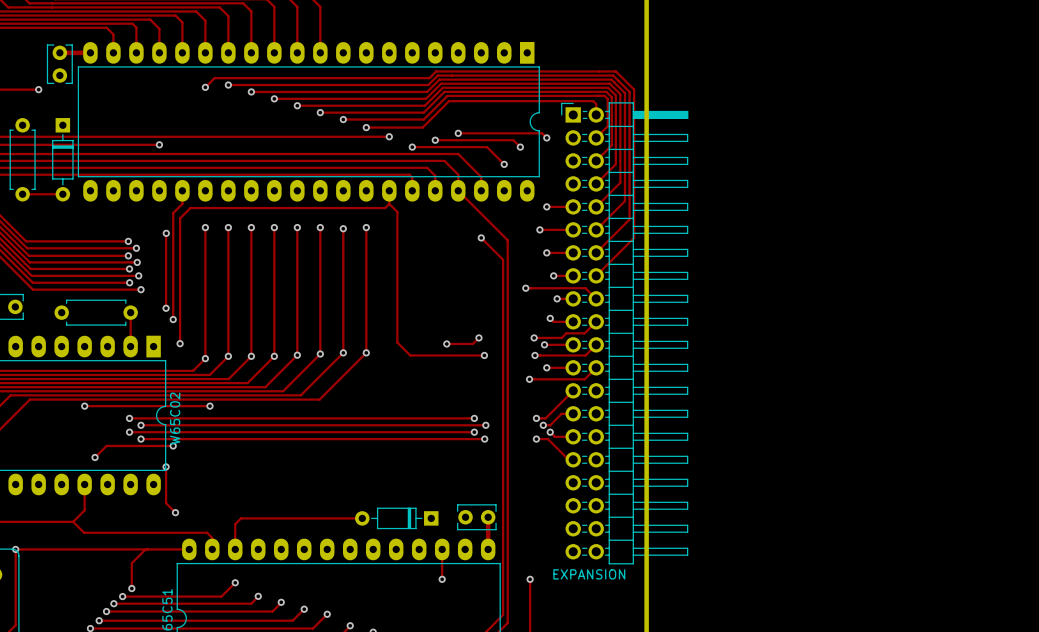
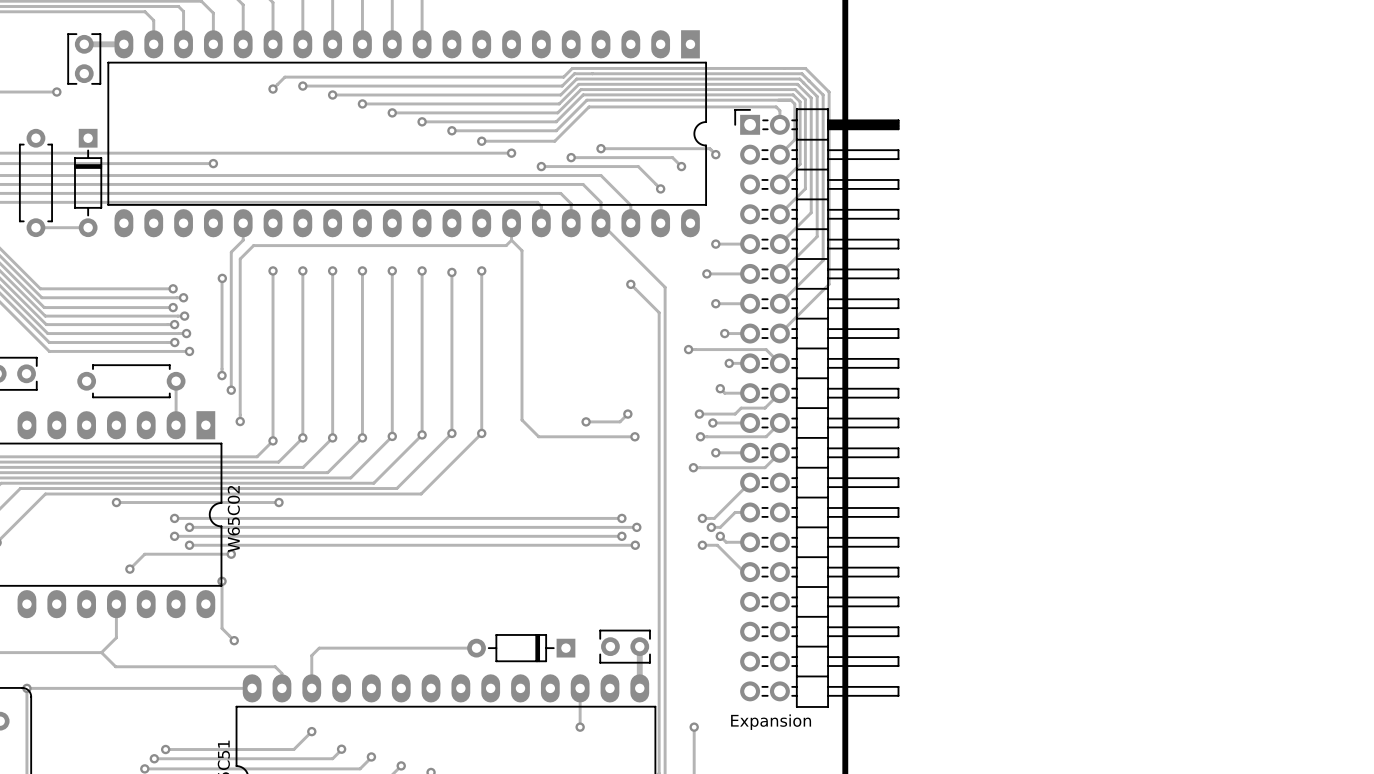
track: (145, 549) (131, 563) (131, 588) -> none
part value: EXPANSION (589, 574) -> Expansion (771, 722)
via: (131, 588) -> none

